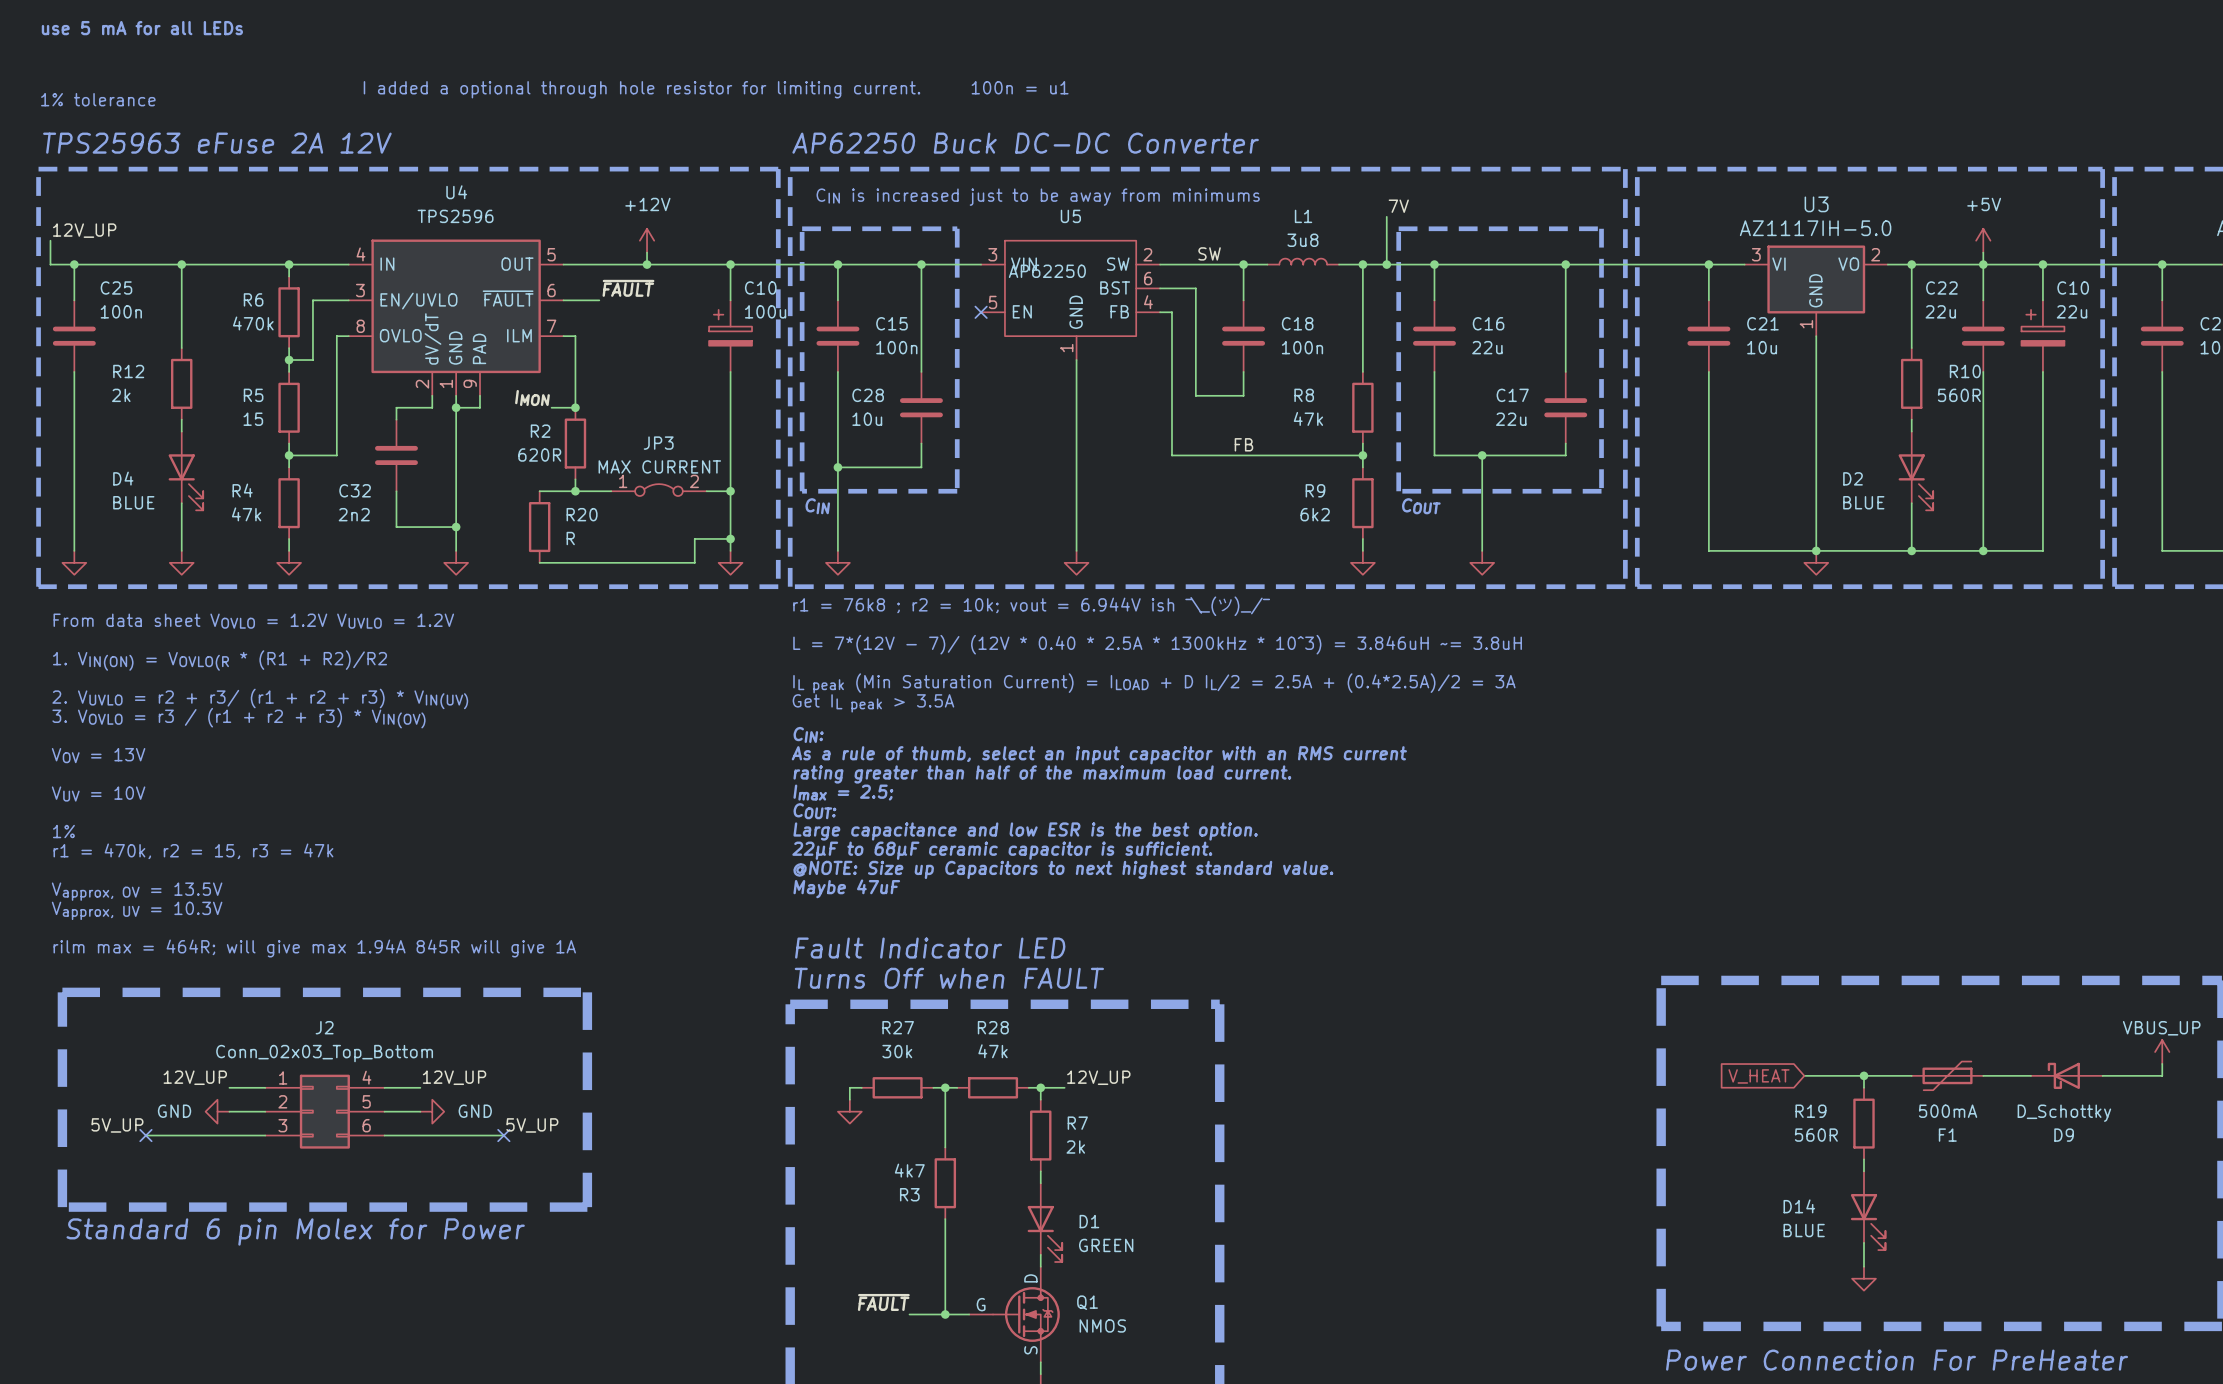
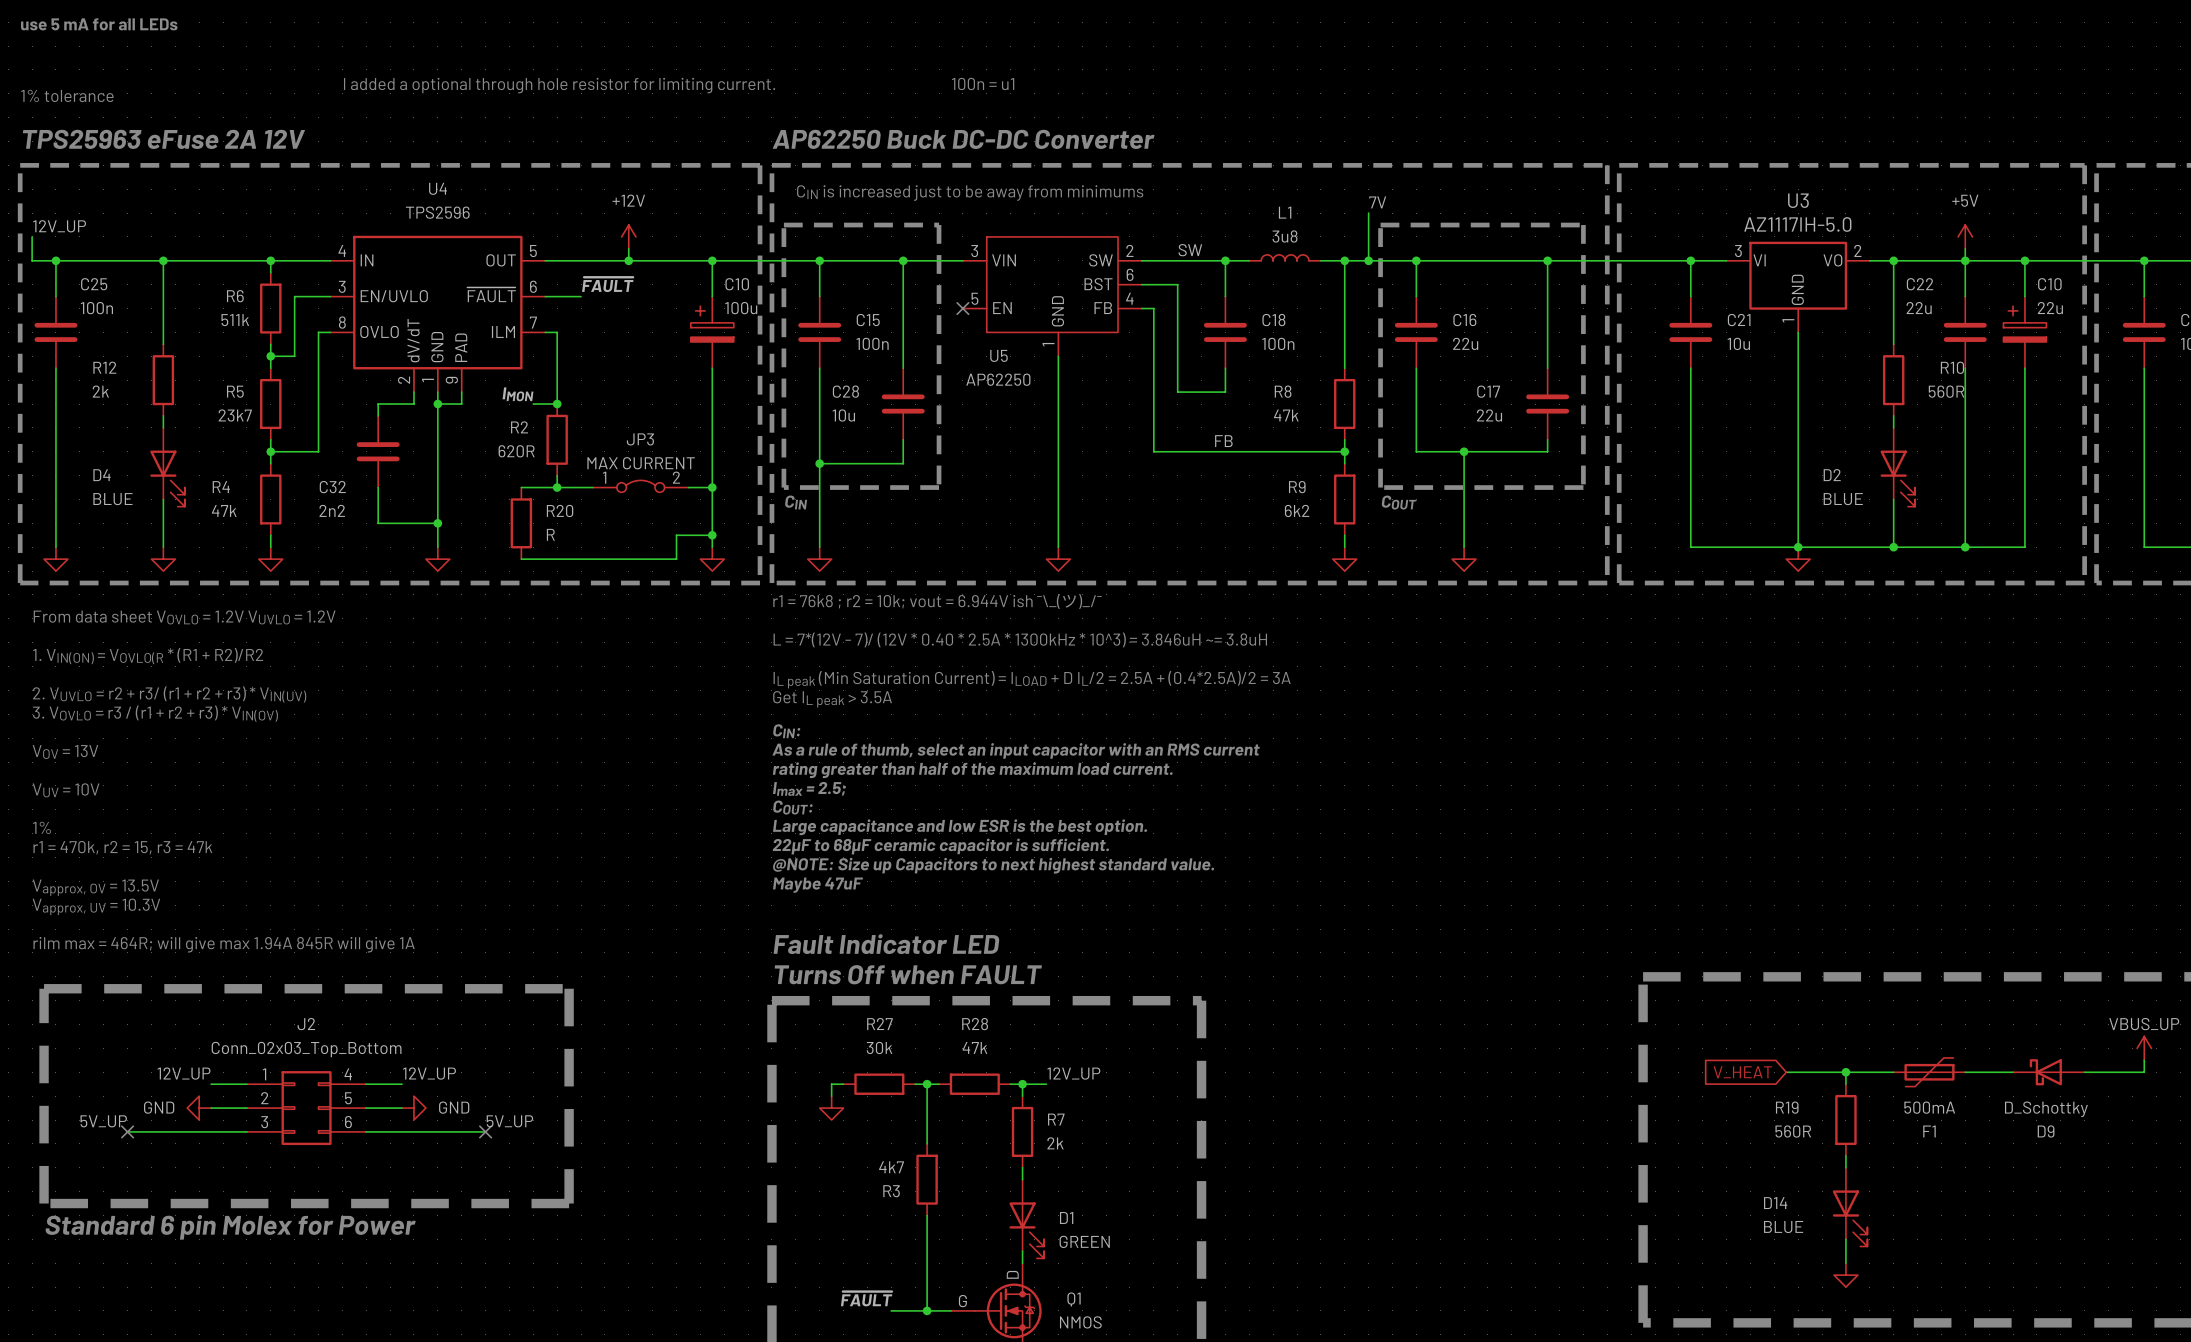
U5 name position: U5 (1070, 216) -> U5 (999, 355)
U5 value position: AP62250 (1047, 271) -> AP62250 (998, 379)
R6 value: 470k (253, 323) -> 511k (235, 320)
R5 value: 15 (253, 419) -> 23k7 (235, 415)

